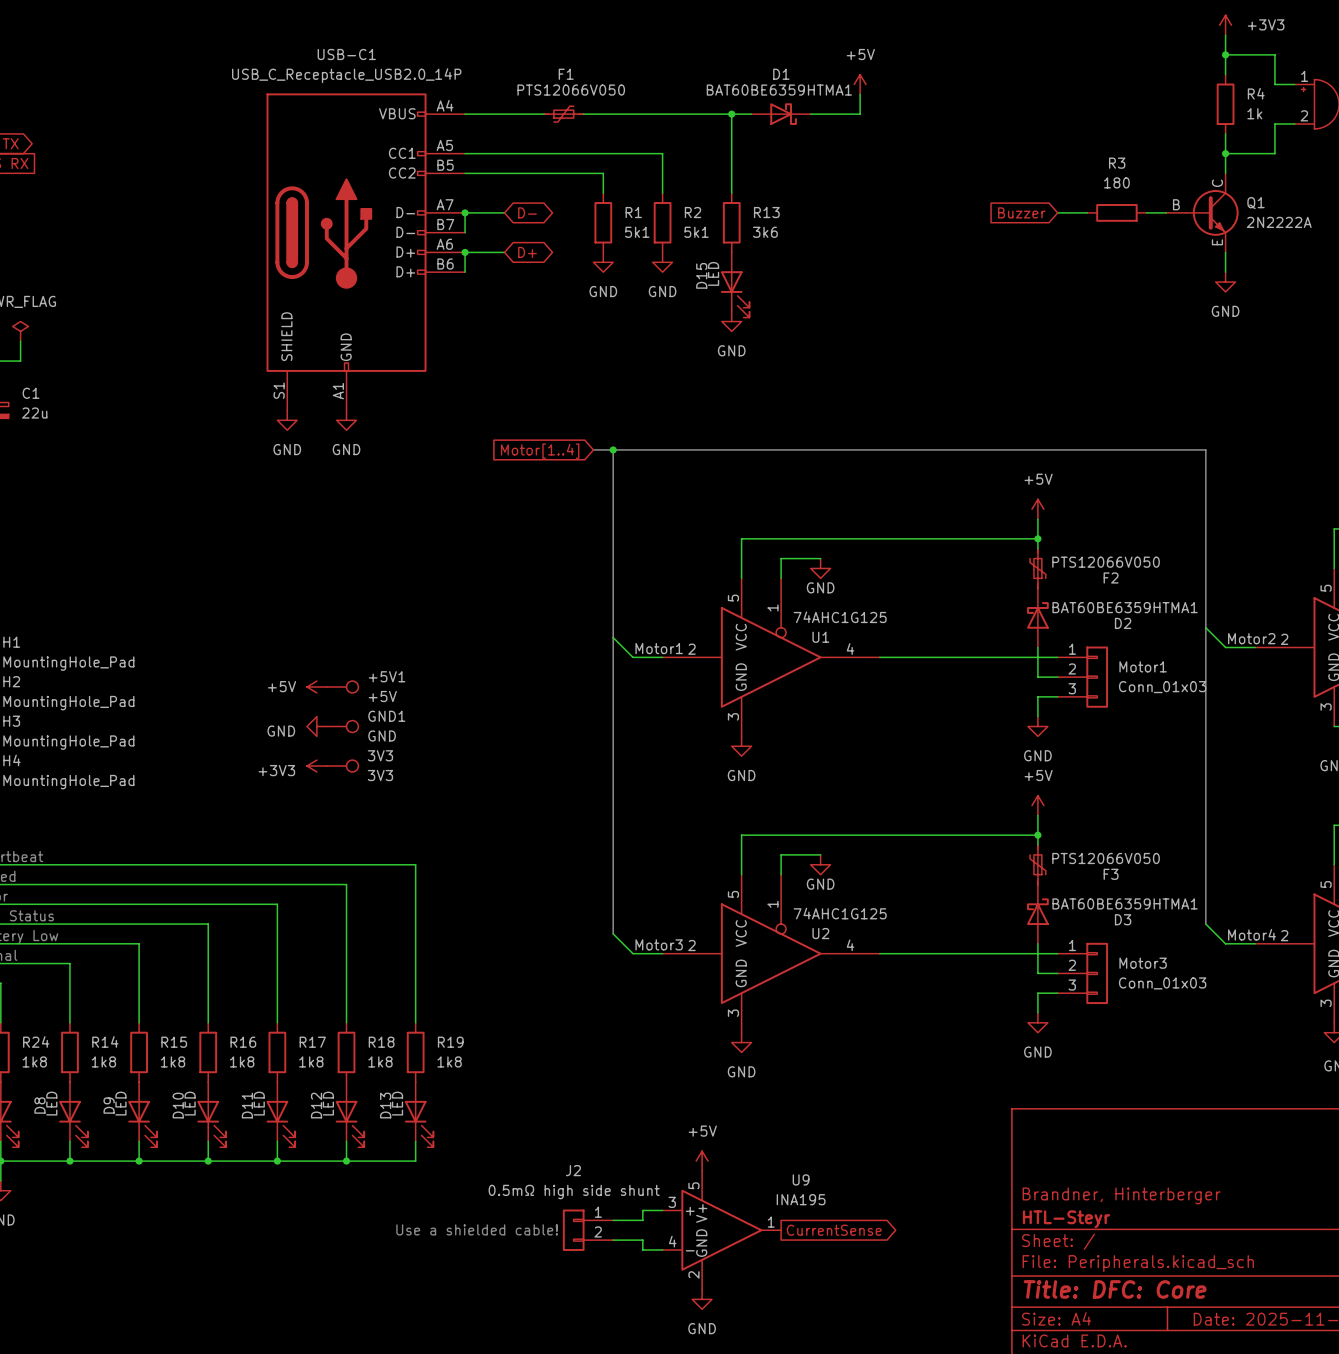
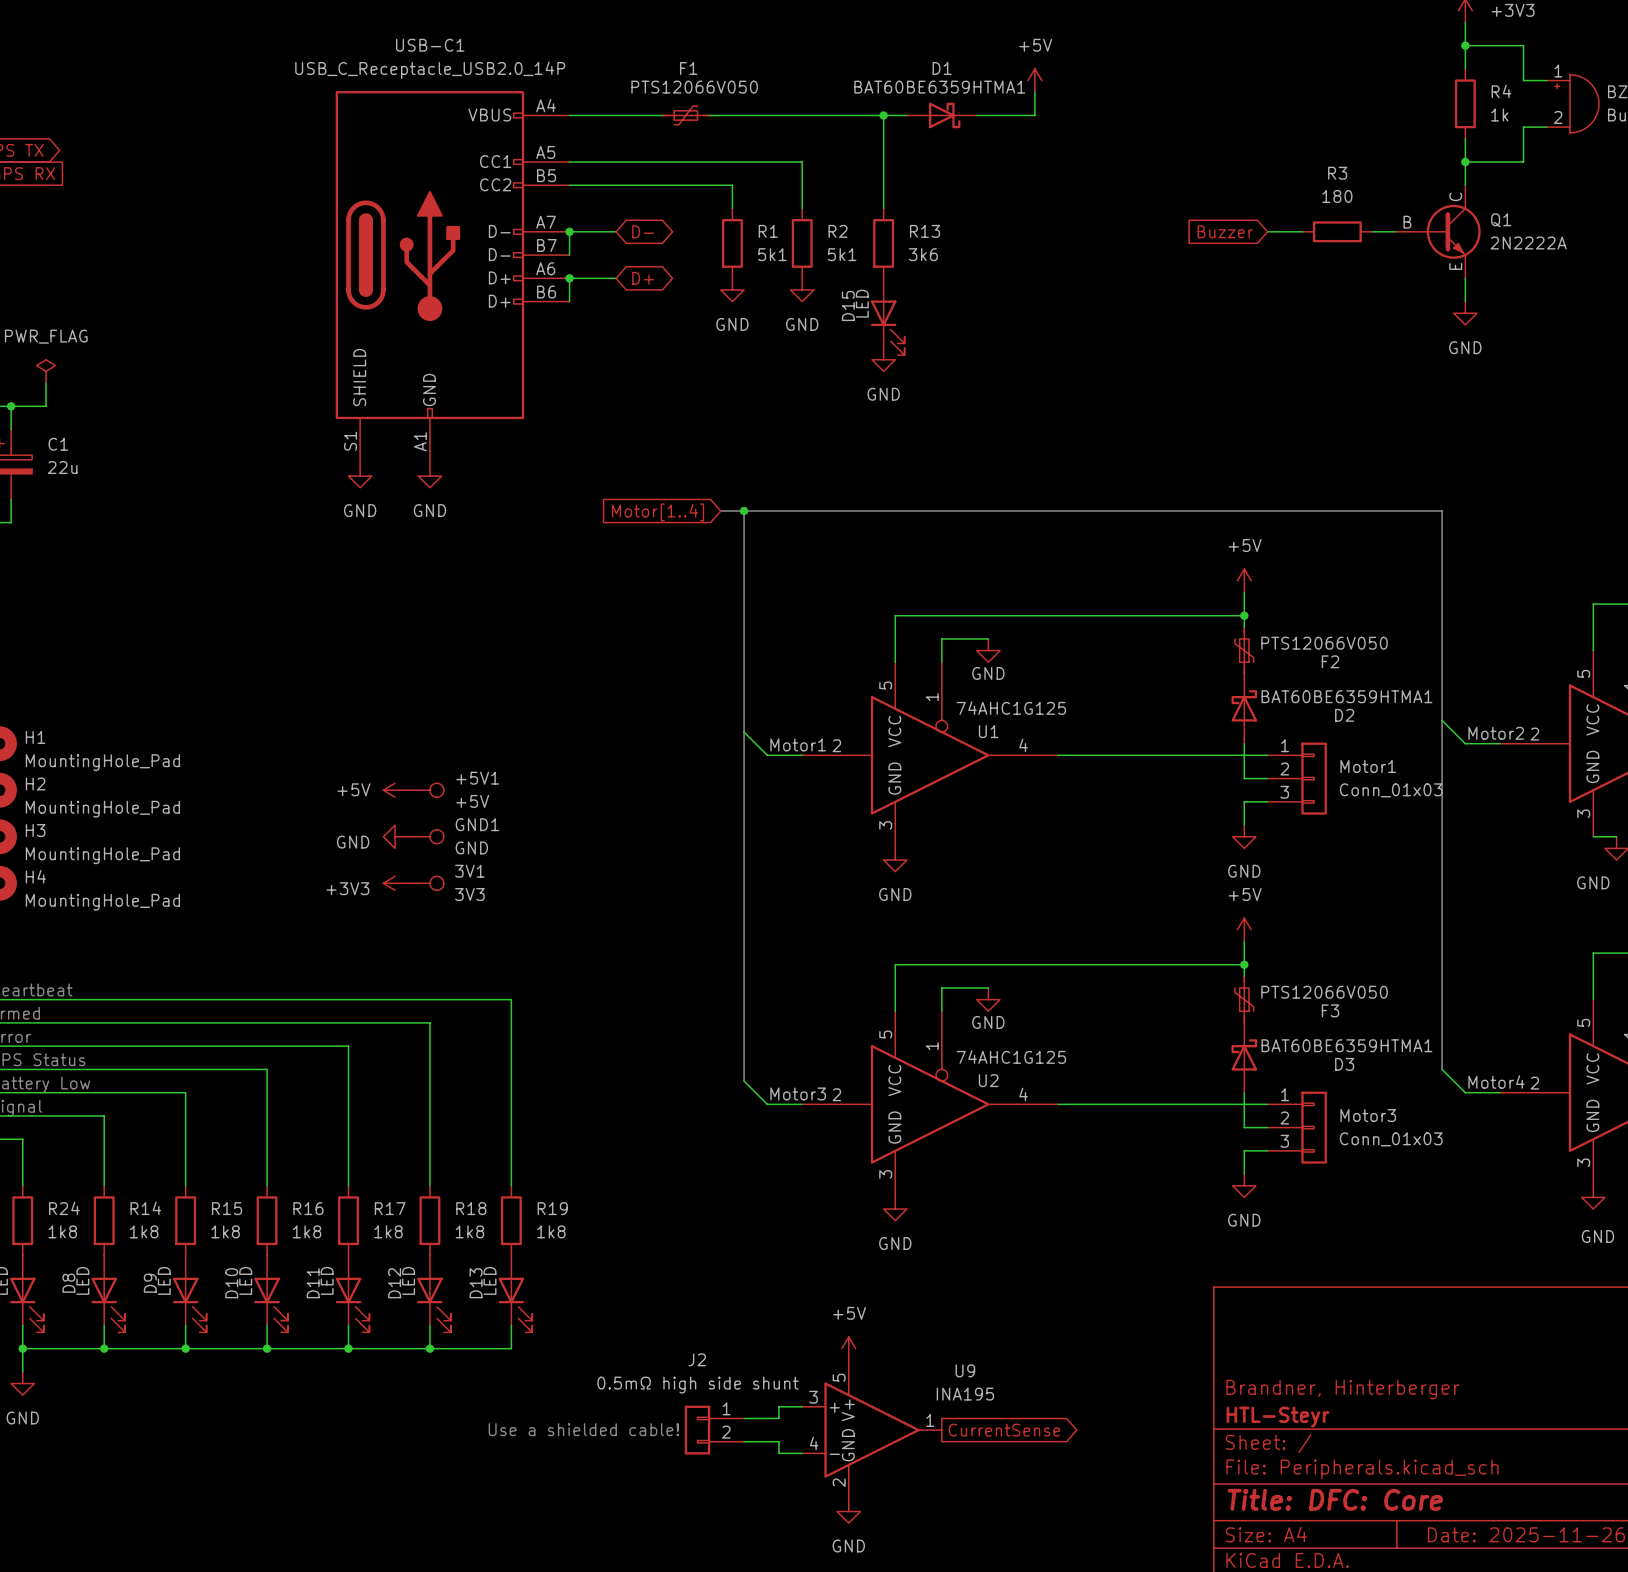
3V3 name: 3V3 (380, 755) -> 3V1 (469, 871)

